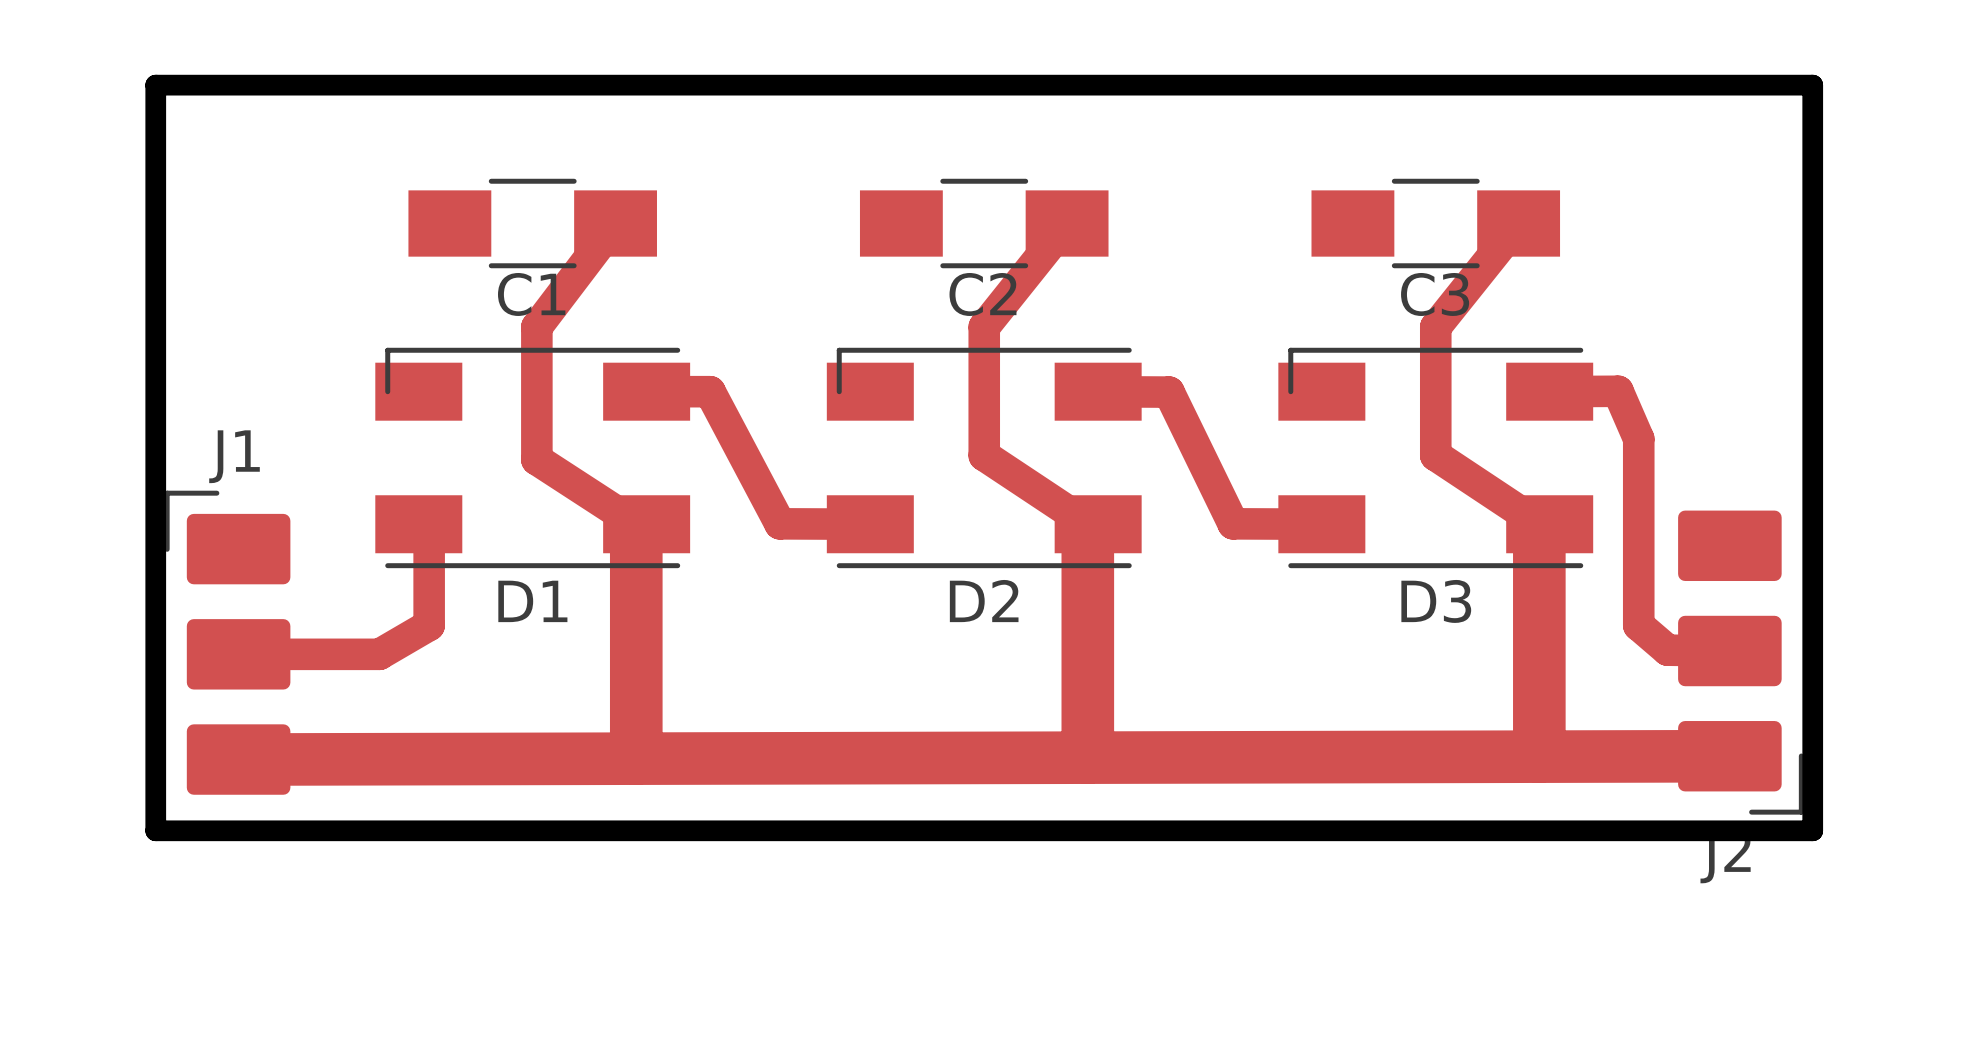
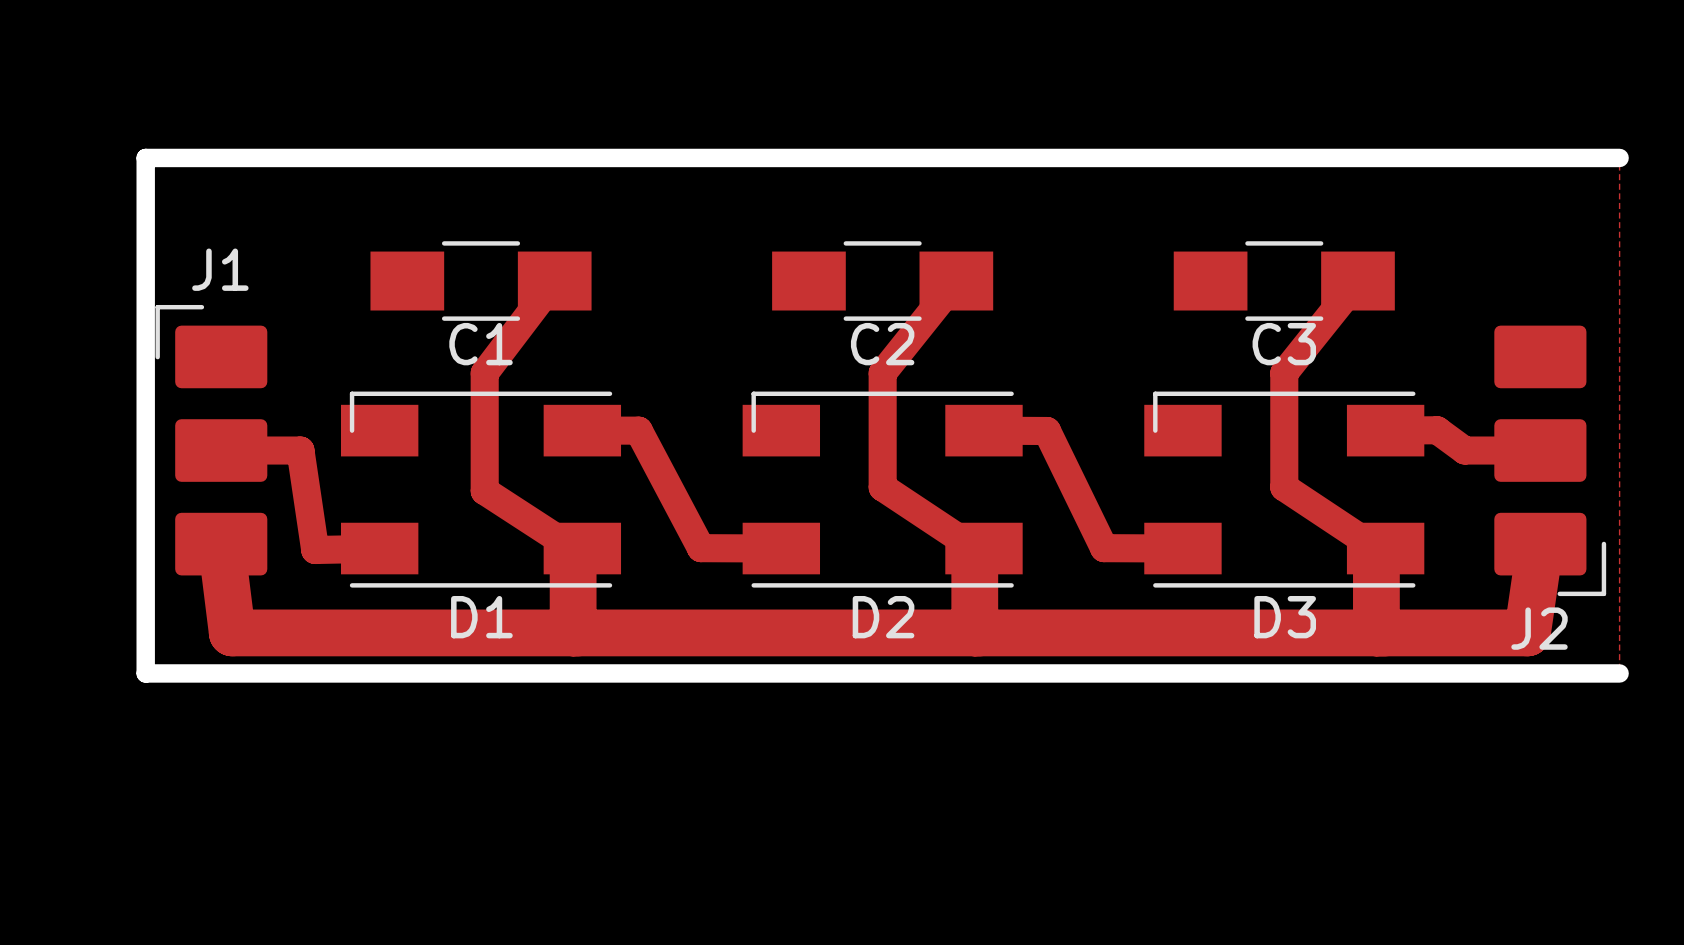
board edge: (1812, 85) (1812, 830) (155, 830) (155, 664) -> (1619, 673) (145, 673)
top track: (1539, 391) (1618, 391) (1638, 438) (1638, 625) (1667, 650) (1729, 651) -> (1376, 430) (1437, 430) (1464, 450) (1540, 450)
top track: none -> (221, 544) (232, 632) (1527, 632) (1540, 544)
top track: (429, 524) (429, 625) (379, 654) (238, 654) -> (388, 548) (315, 550) (300, 450) (221, 450)
top track: (636, 619) (636, 758) -> none
top track: (1087, 619) (1087, 757) -> none
top track: (1539, 619) (1539, 756) -> none
J1 position: (227, 642) -> (211, 440)
J2 position: (1740, 662) -> (1550, 460)
top track: (1729, 756) (238, 759) -> none

